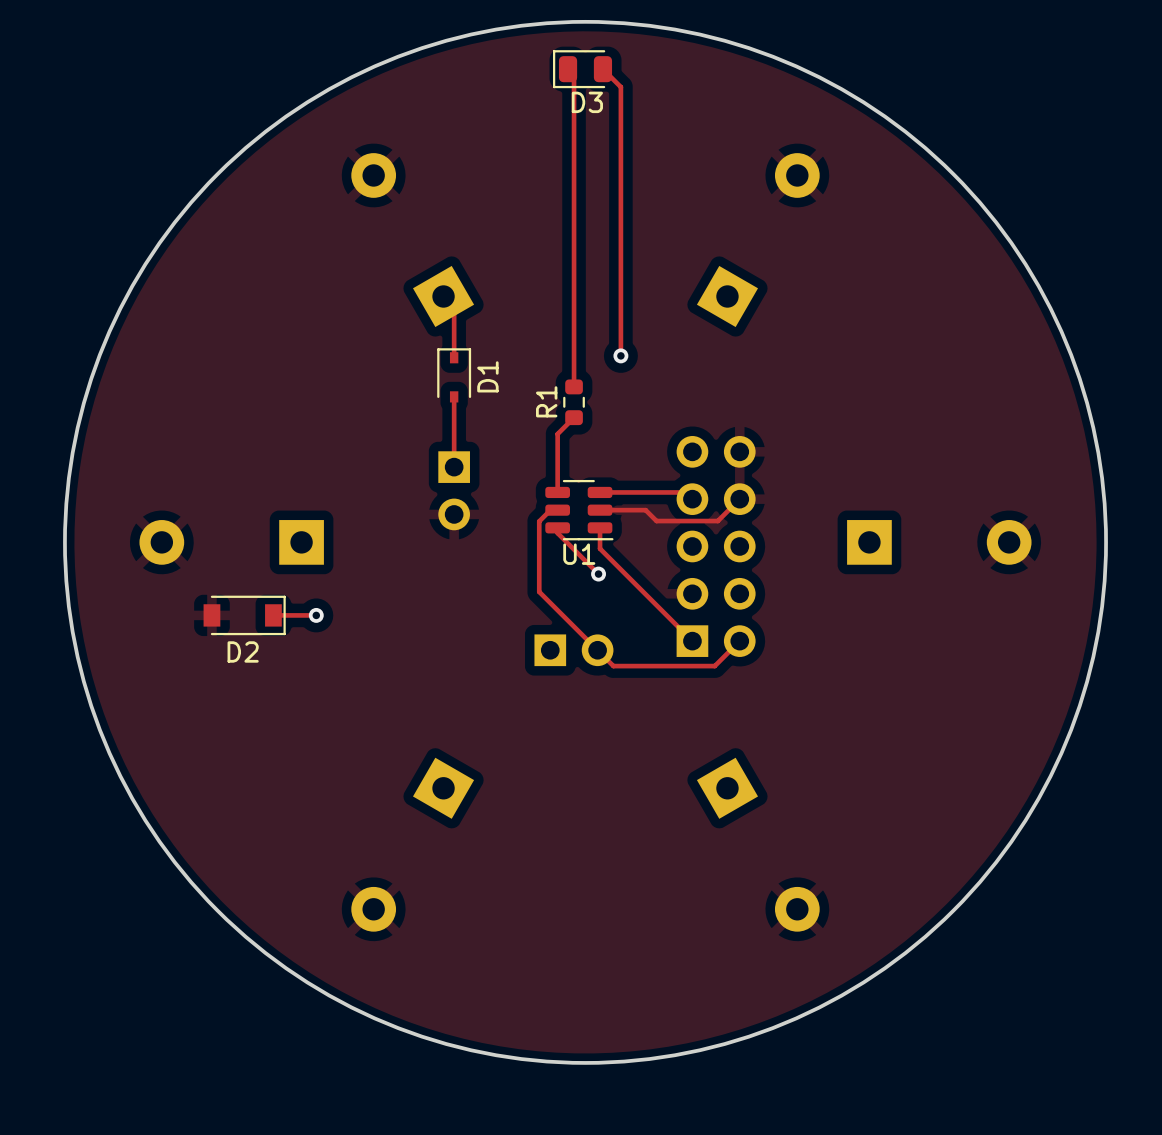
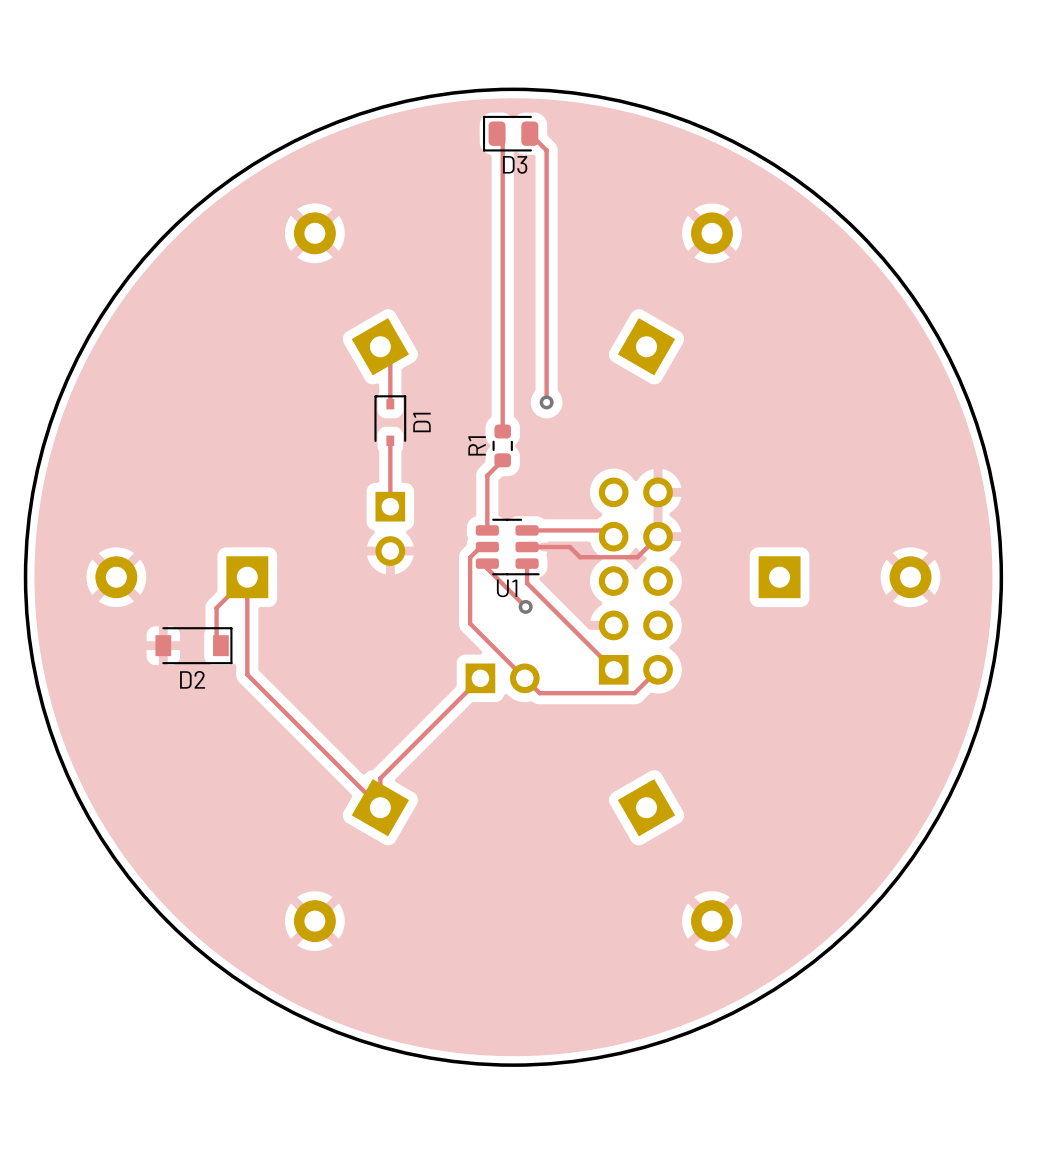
track: none -> (216, 645) (216, 607) (247, 577) (247, 674) (380, 807) (380, 778) (480, 678)
track: (273, 615) (316, 615) -> none
via: (316, 615) -> none

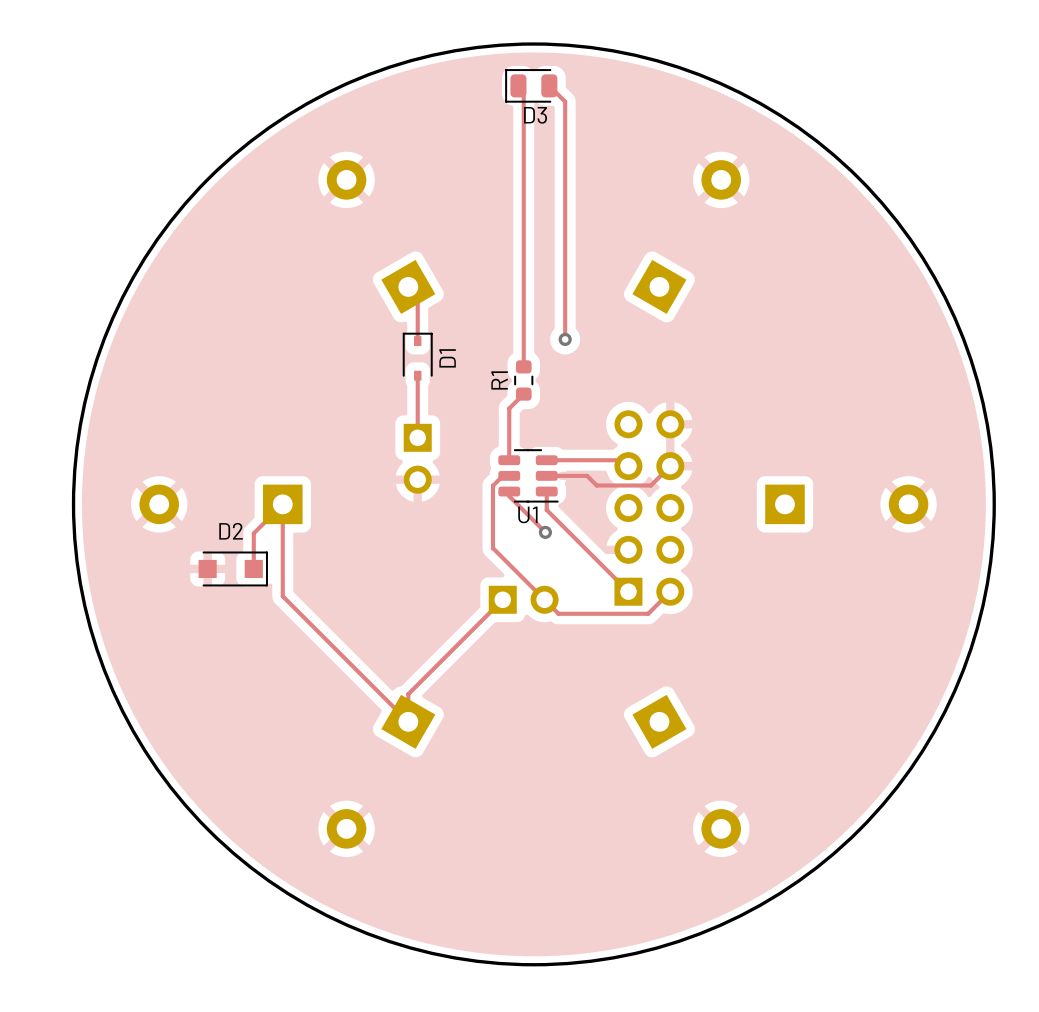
D2 footprint: [155, 627, 233, 665] -> [198, 551, 268, 587]
D2 name position: D2 (192, 679) -> D2 (231, 531)

